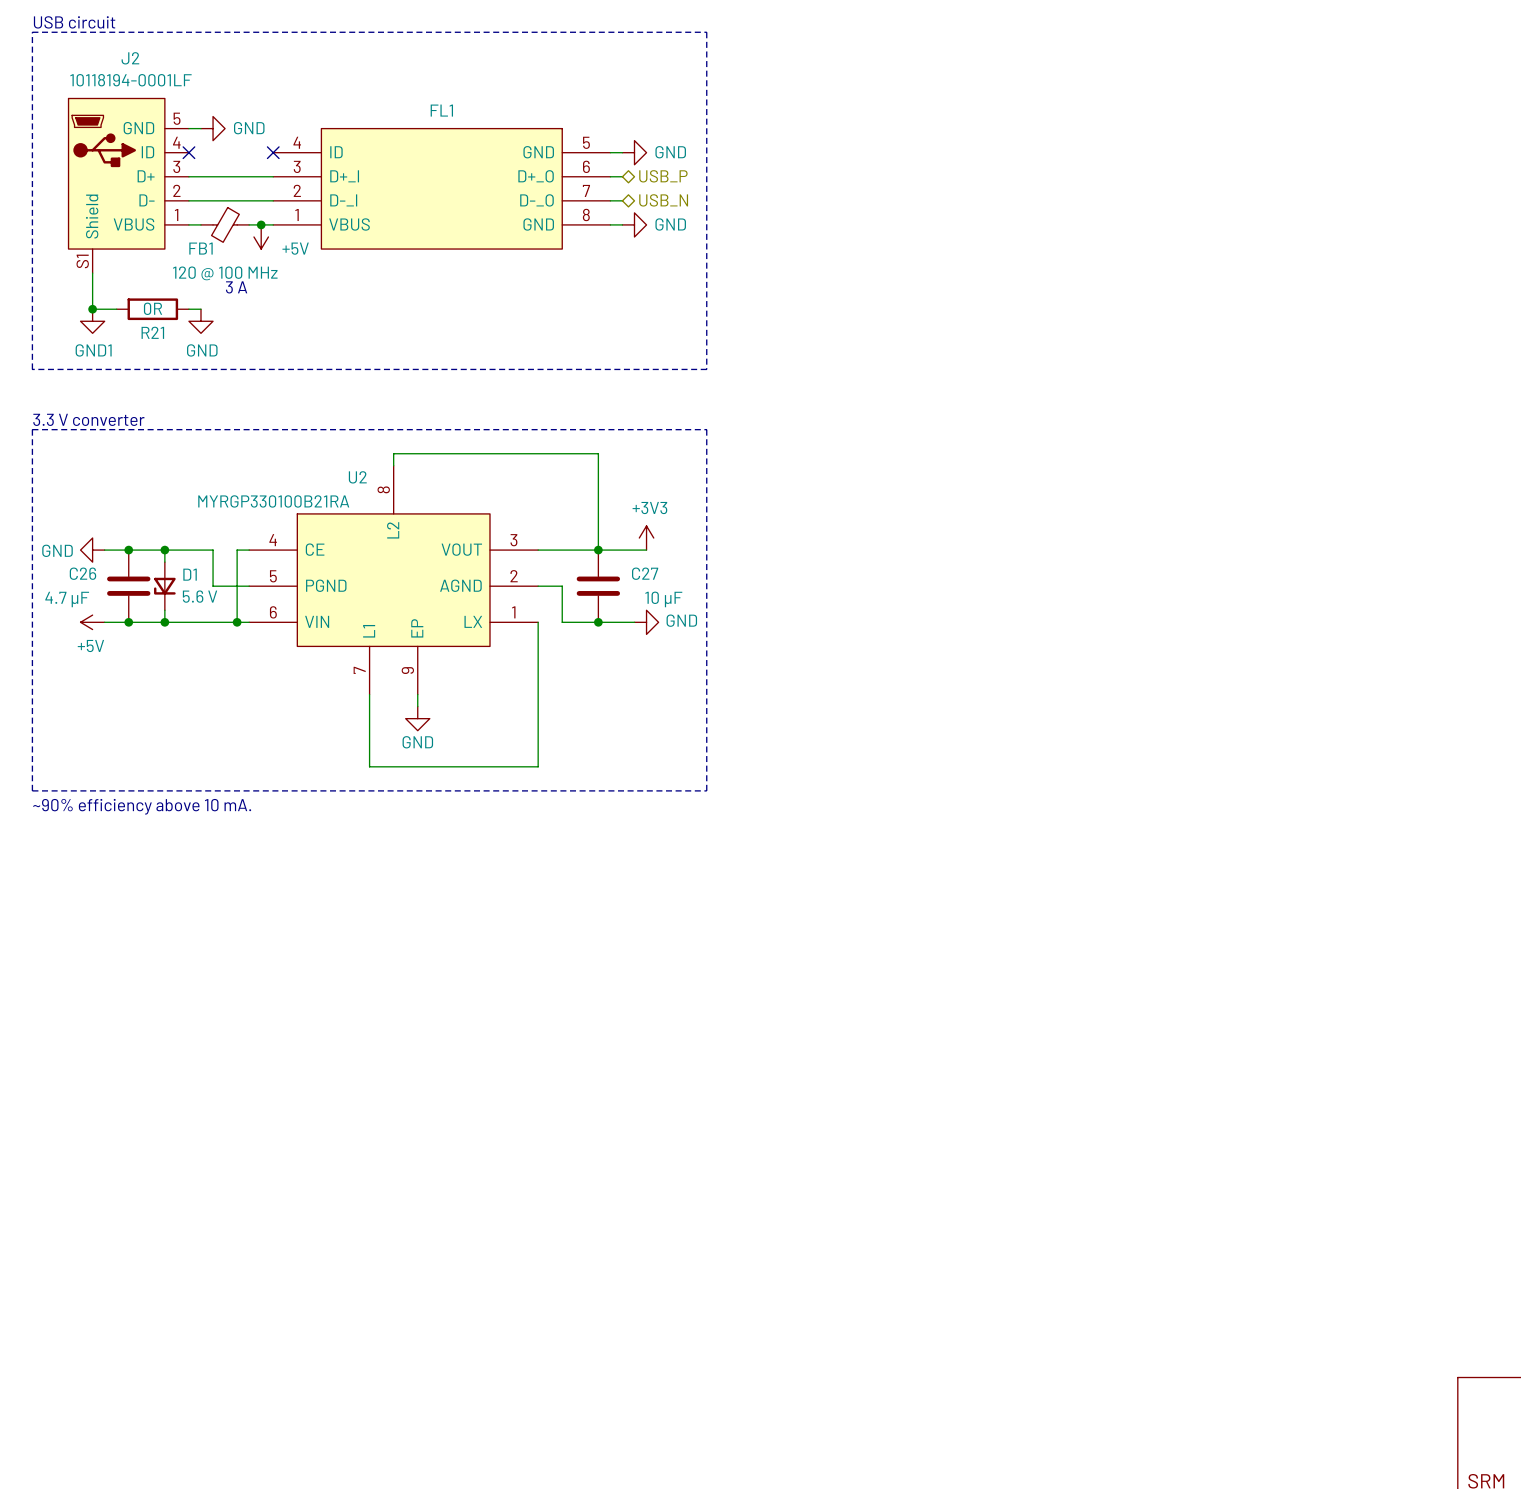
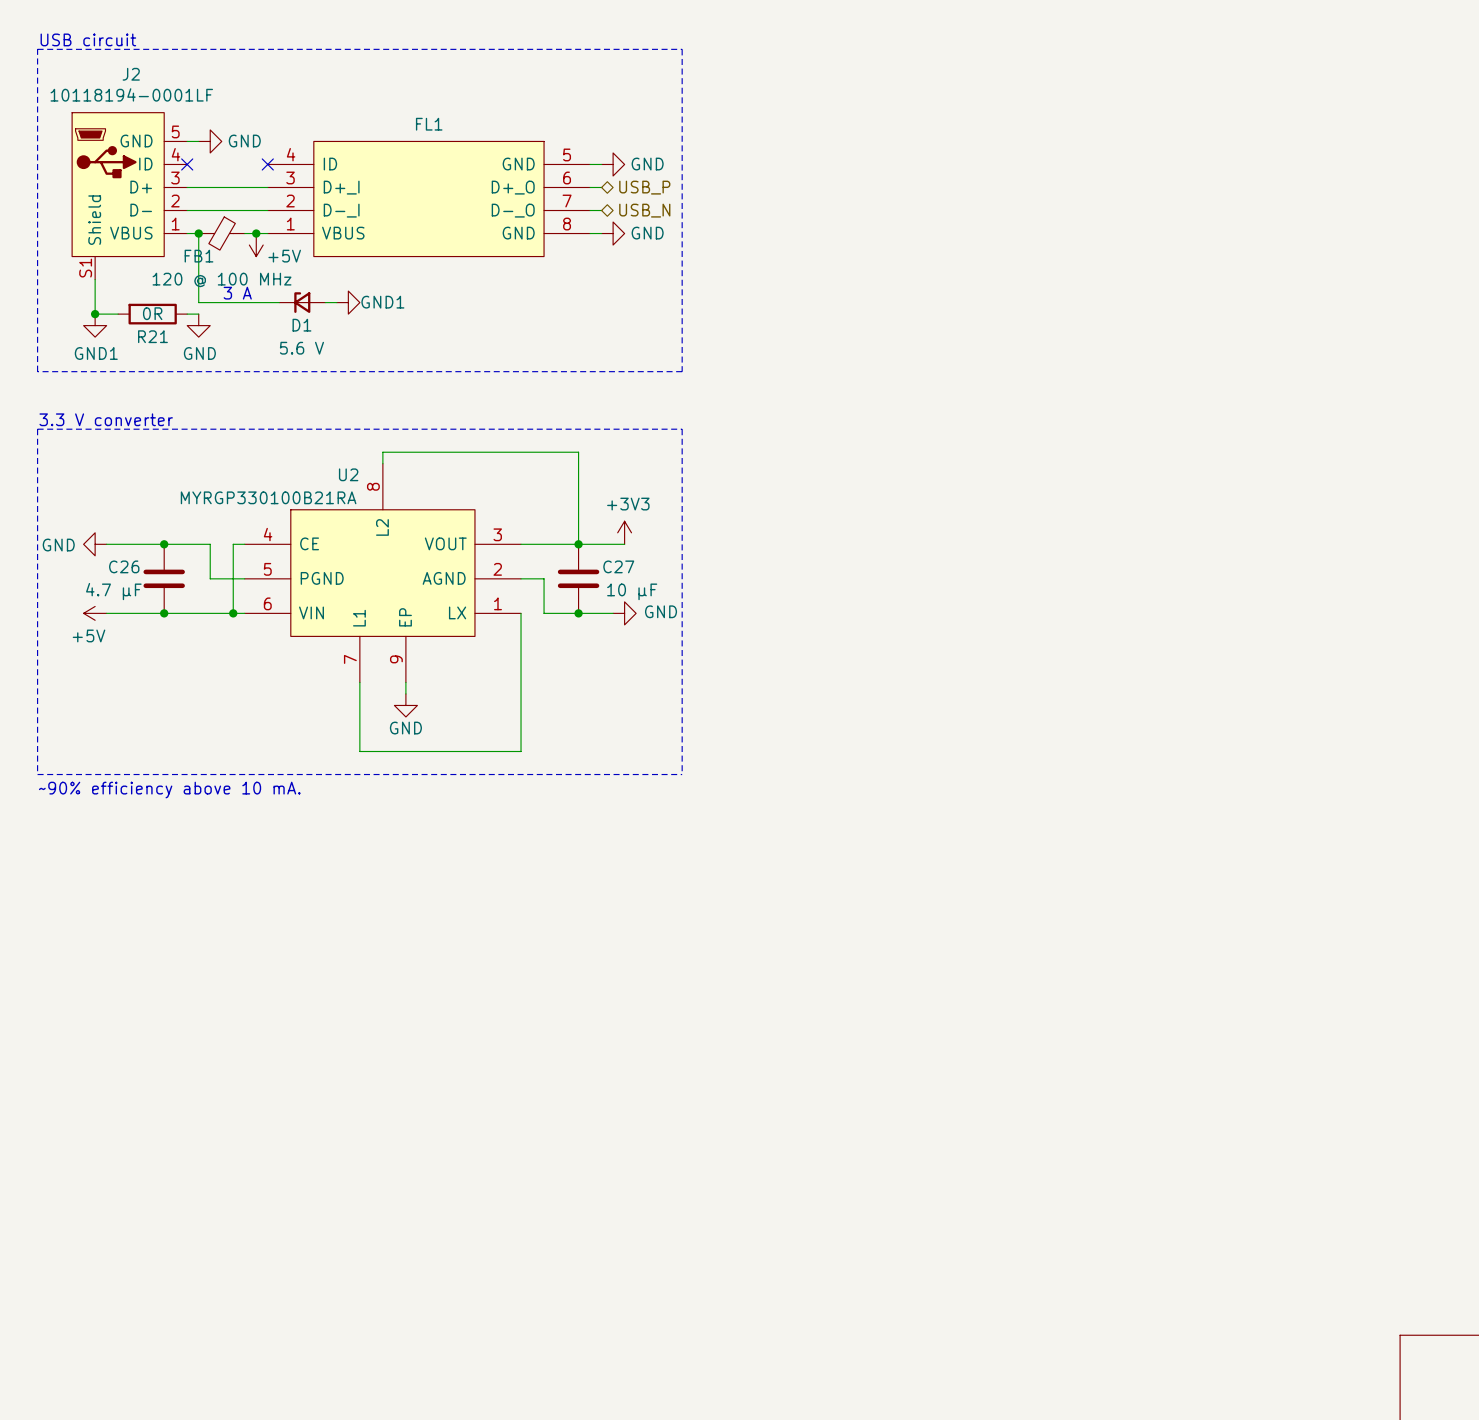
wire: none -> (198, 233) (198, 302) (279, 302)
junction: none -> (198, 233)
wire: none -> (325, 302) (336, 302)
power symbol: none -> GND1 (348, 302)
junction: (128, 550) -> none
C26 position: (128, 586) -> (164, 578)
D1 rotation: 0° (164, 586) -> 90° clockwise (302, 302)
D1 position: (164, 586) -> (302, 302)
junction: (128, 622) -> none

